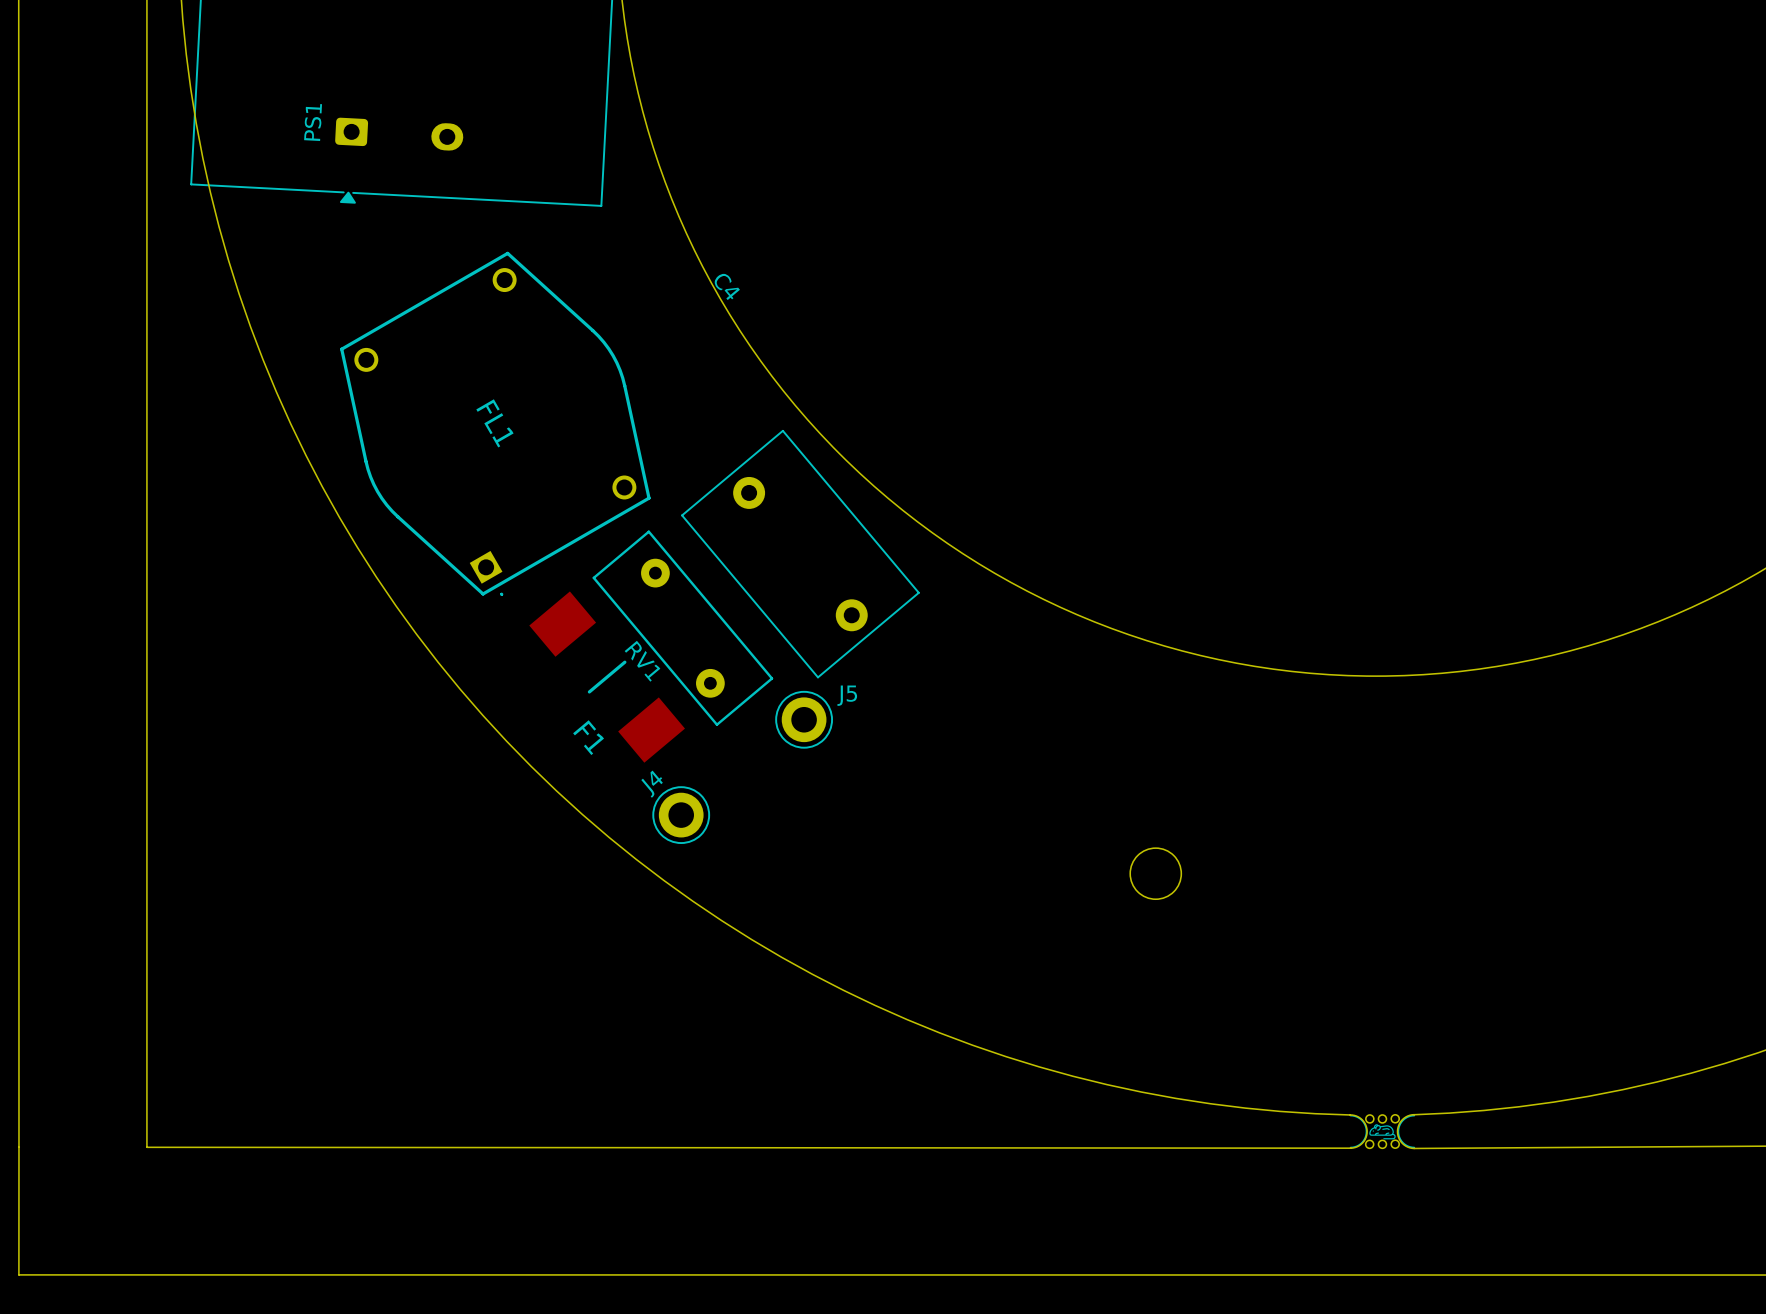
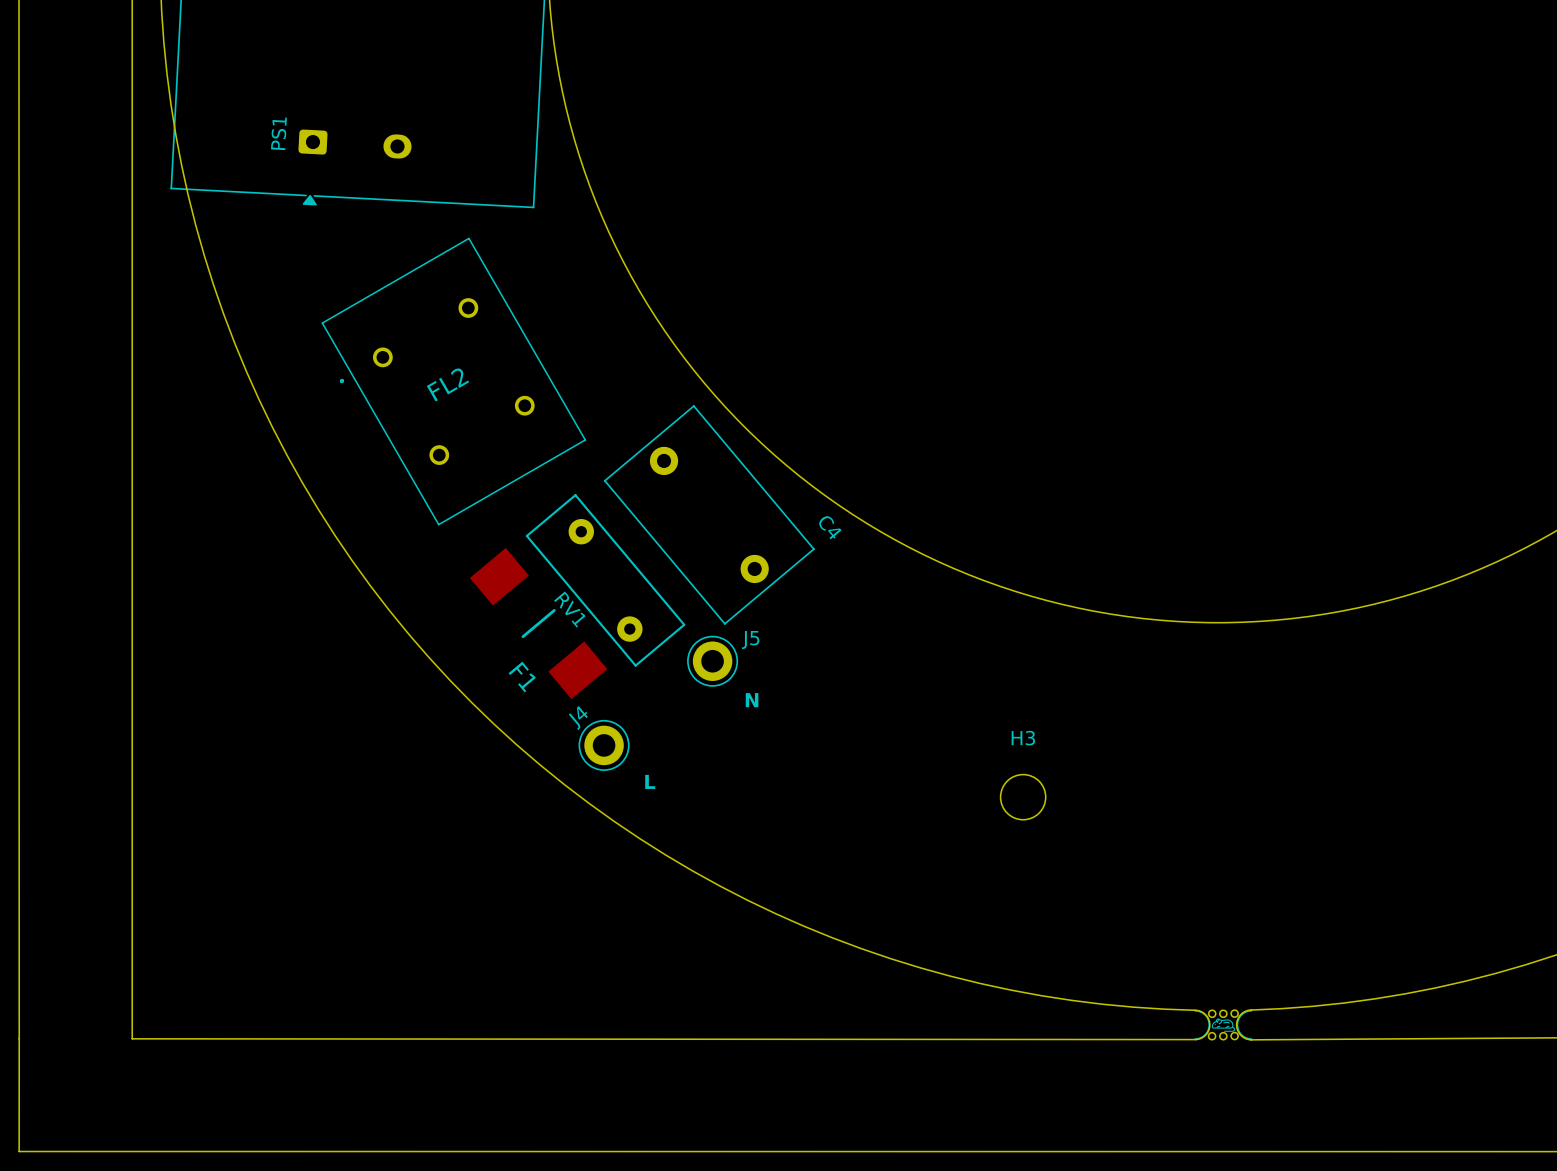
C4 name position: C4 (727, 286) -> C4 (830, 527)
FL2: none -> (453, 381)
FL1: (495, 423) -> none
text: none -> N (752, 700)
H3 name: none -> H3 (1023, 738)
text: none -> L (650, 781)

